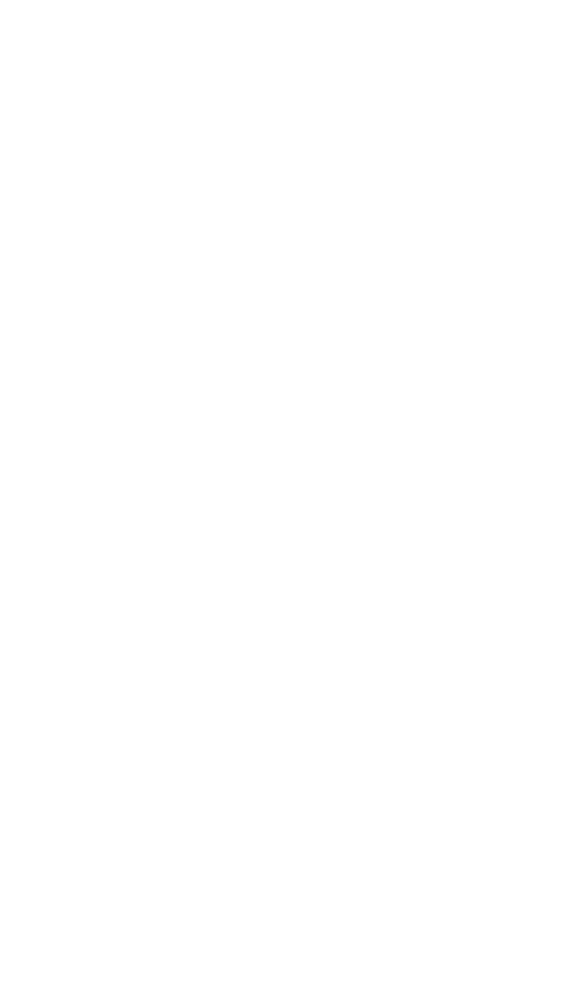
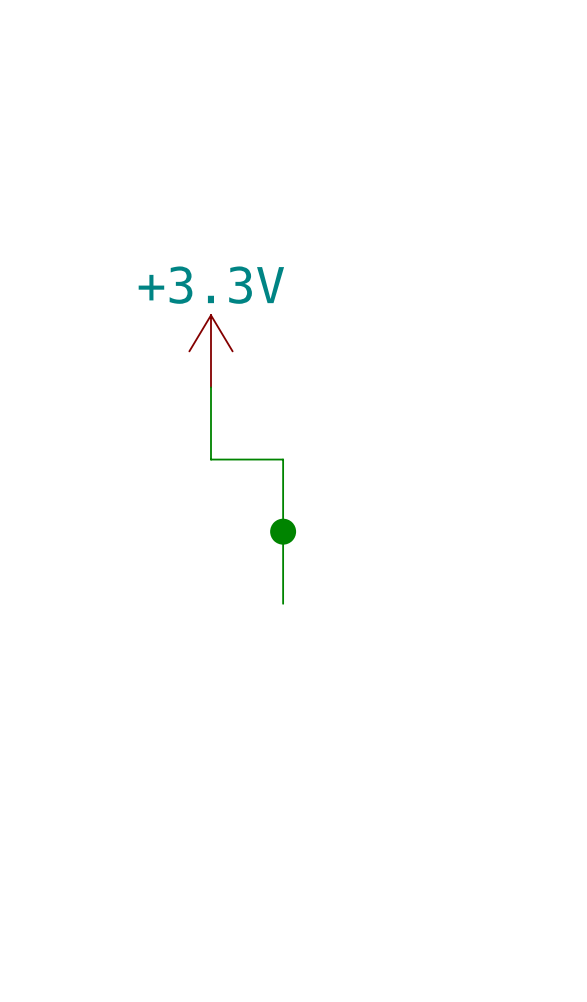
power symbol: none -> +3.3V (210, 351)
wire: none -> (210, 387) (210, 459) (283, 459) (283, 603)
junction: none -> (283, 531)

